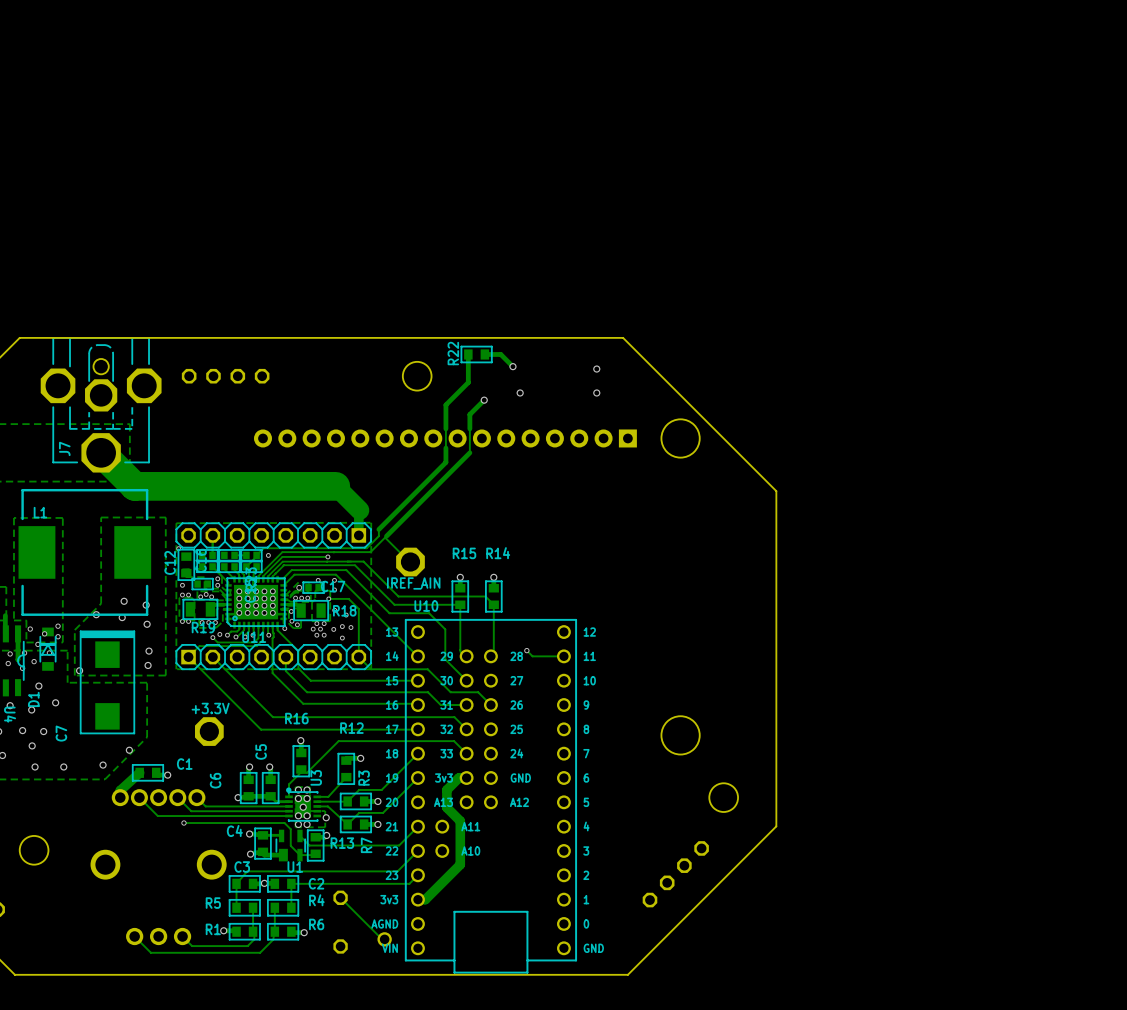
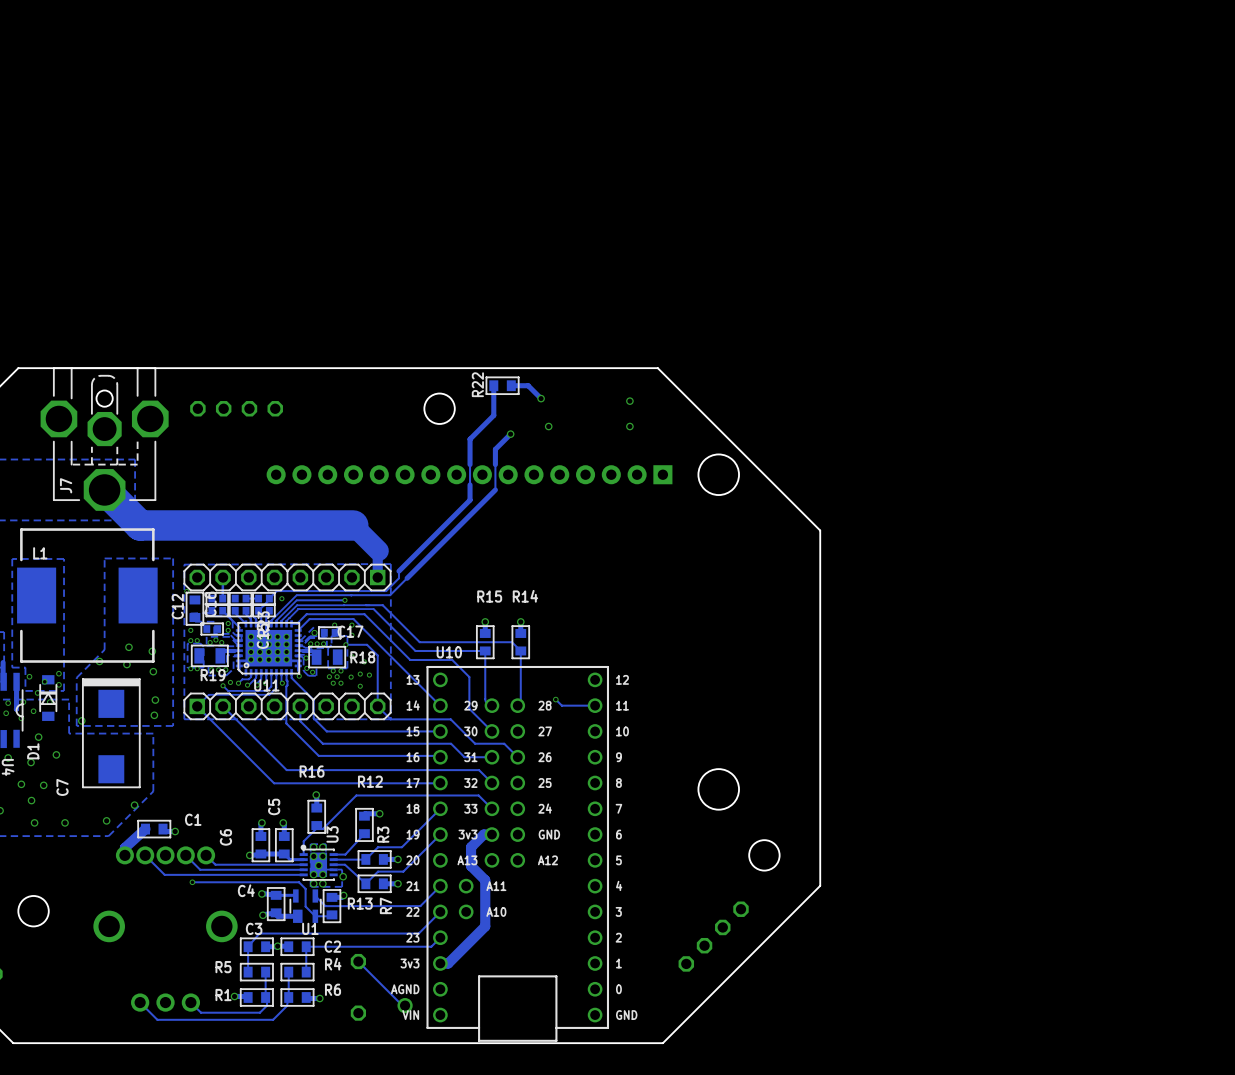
track: (385, 537) (410, 562) -> none
part: (410, 562) -> none
text: IREF_AIN (413, 583) -> none
text: +3.3V (210, 708) -> none
part: (209, 731) -> none

